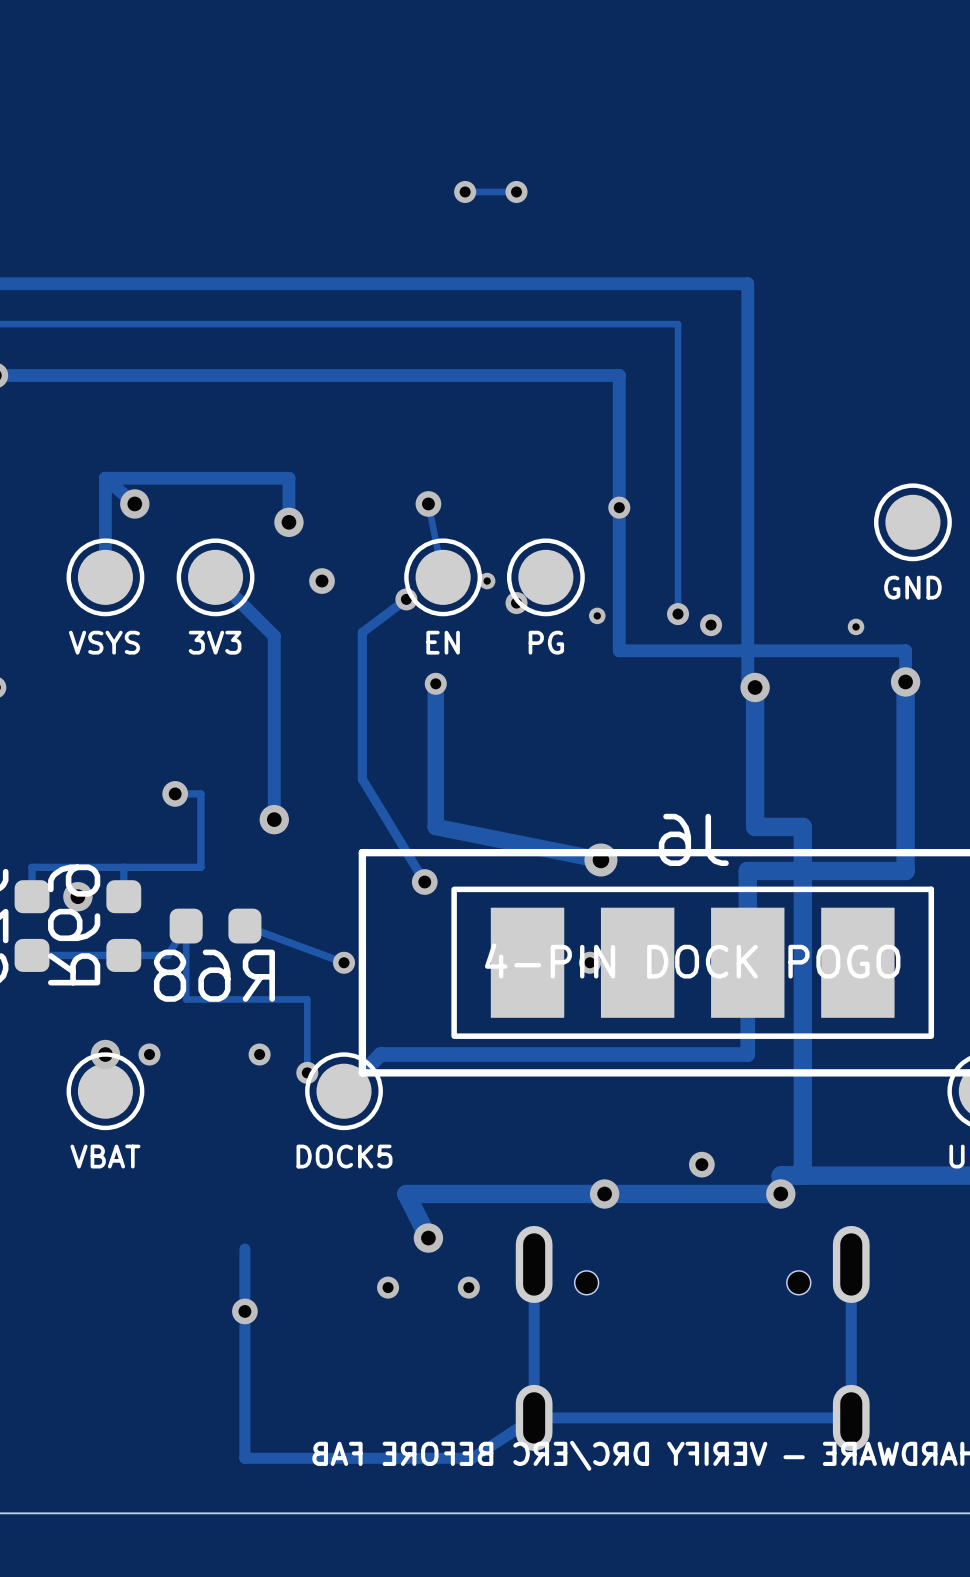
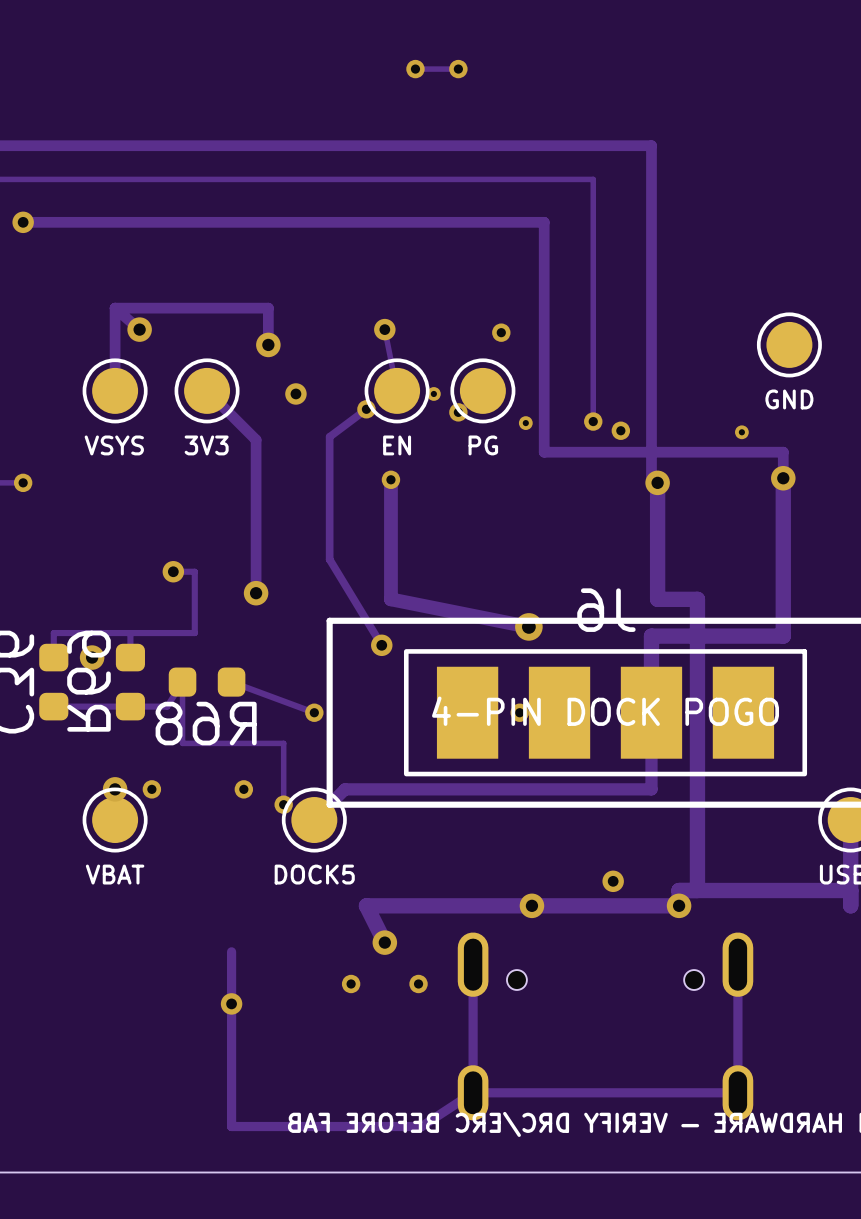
via position: (619, 507) -> (501, 332)

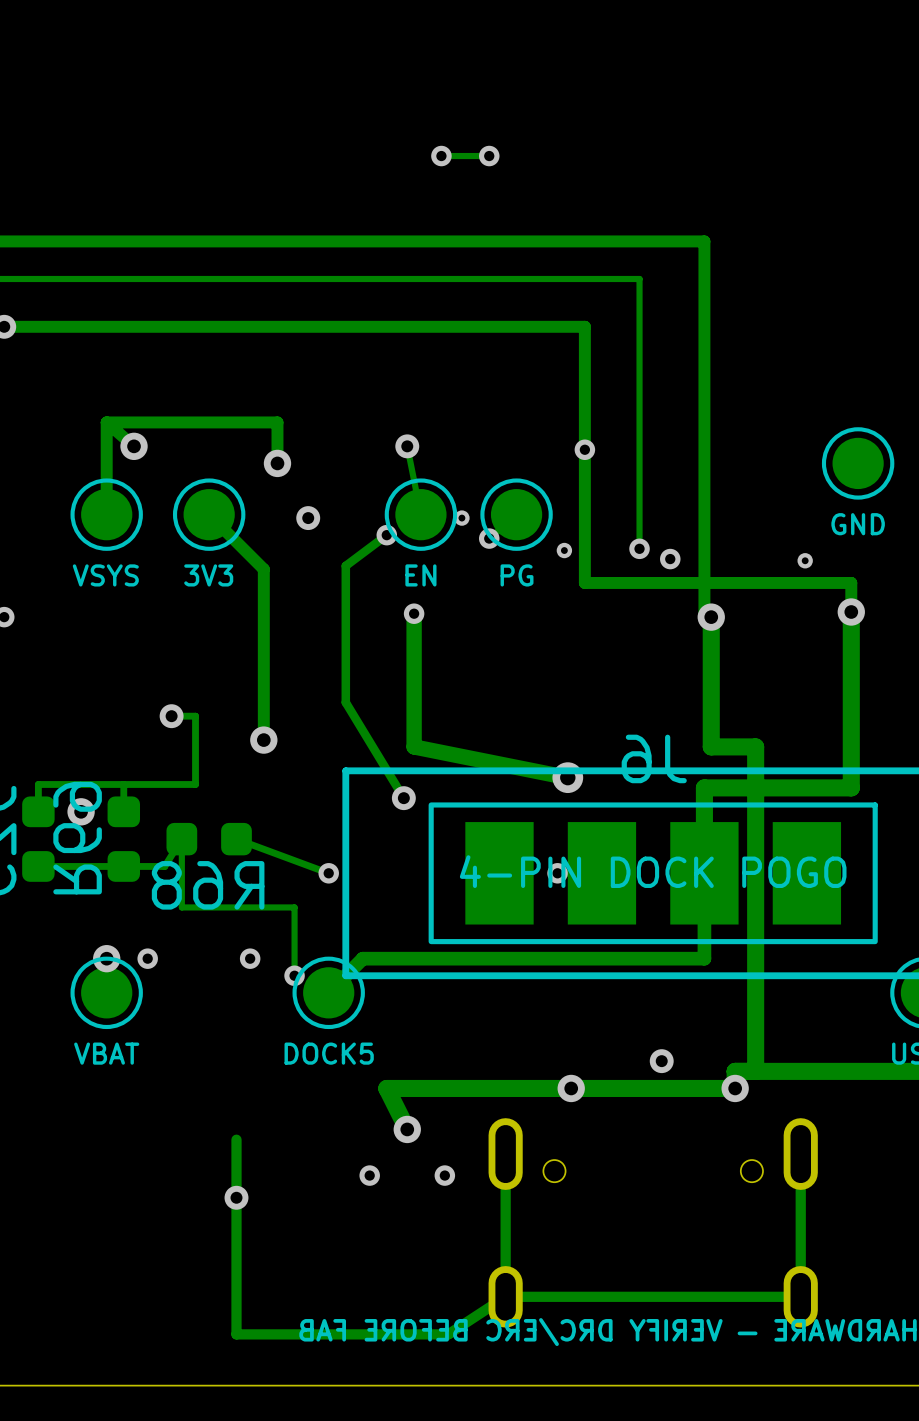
via position: (501, 332) -> (584, 449)

